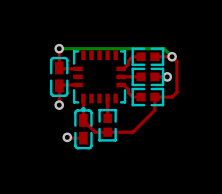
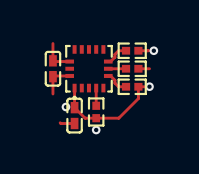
bottom track: (59, 48) (164, 48) (172, 56) -> none
via: (59, 48) -> none
top track: (166, 56) (172, 56) (176, 61) (176, 92) (172, 97) (167, 97) -> none
via position: (167, 76) -> (149, 86)
via: (59, 105) -> none
via: none -> (65, 107)
via: (67, 137) -> none
via: none -> (96, 130)

